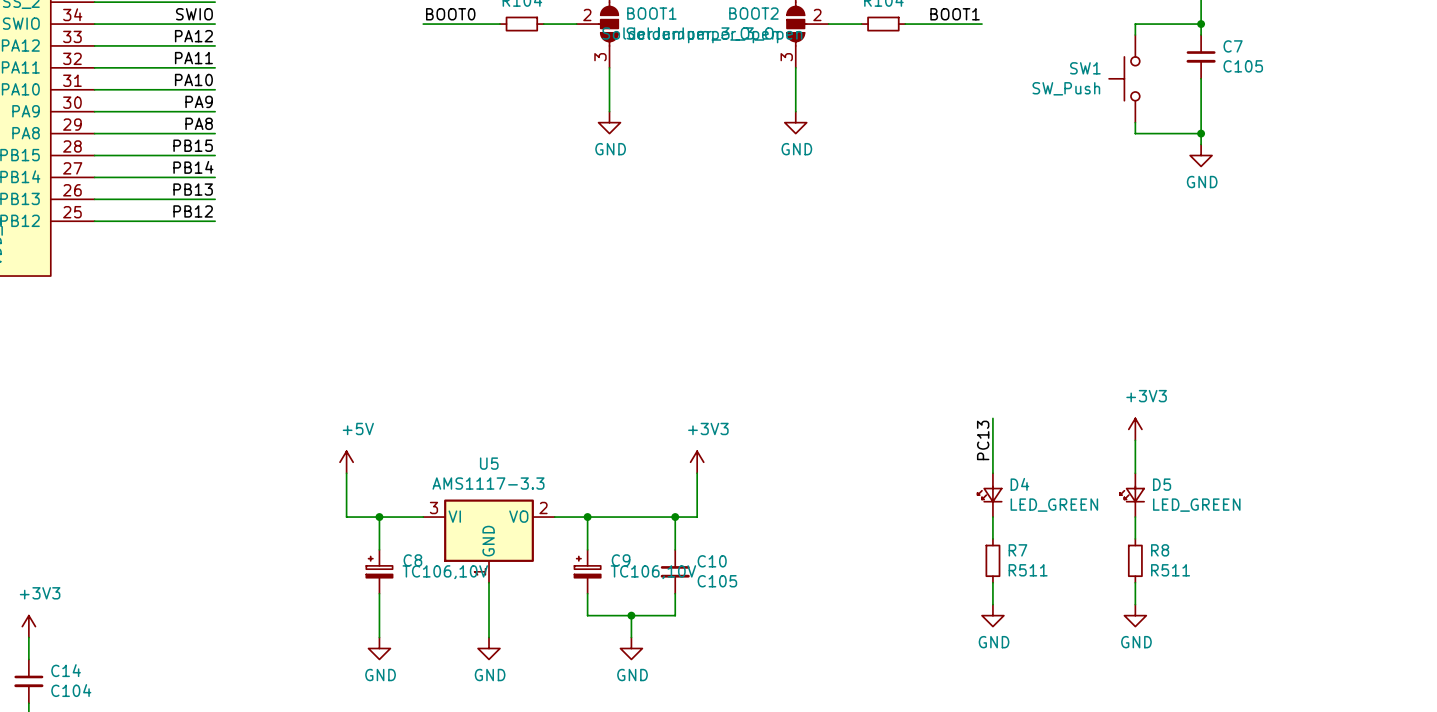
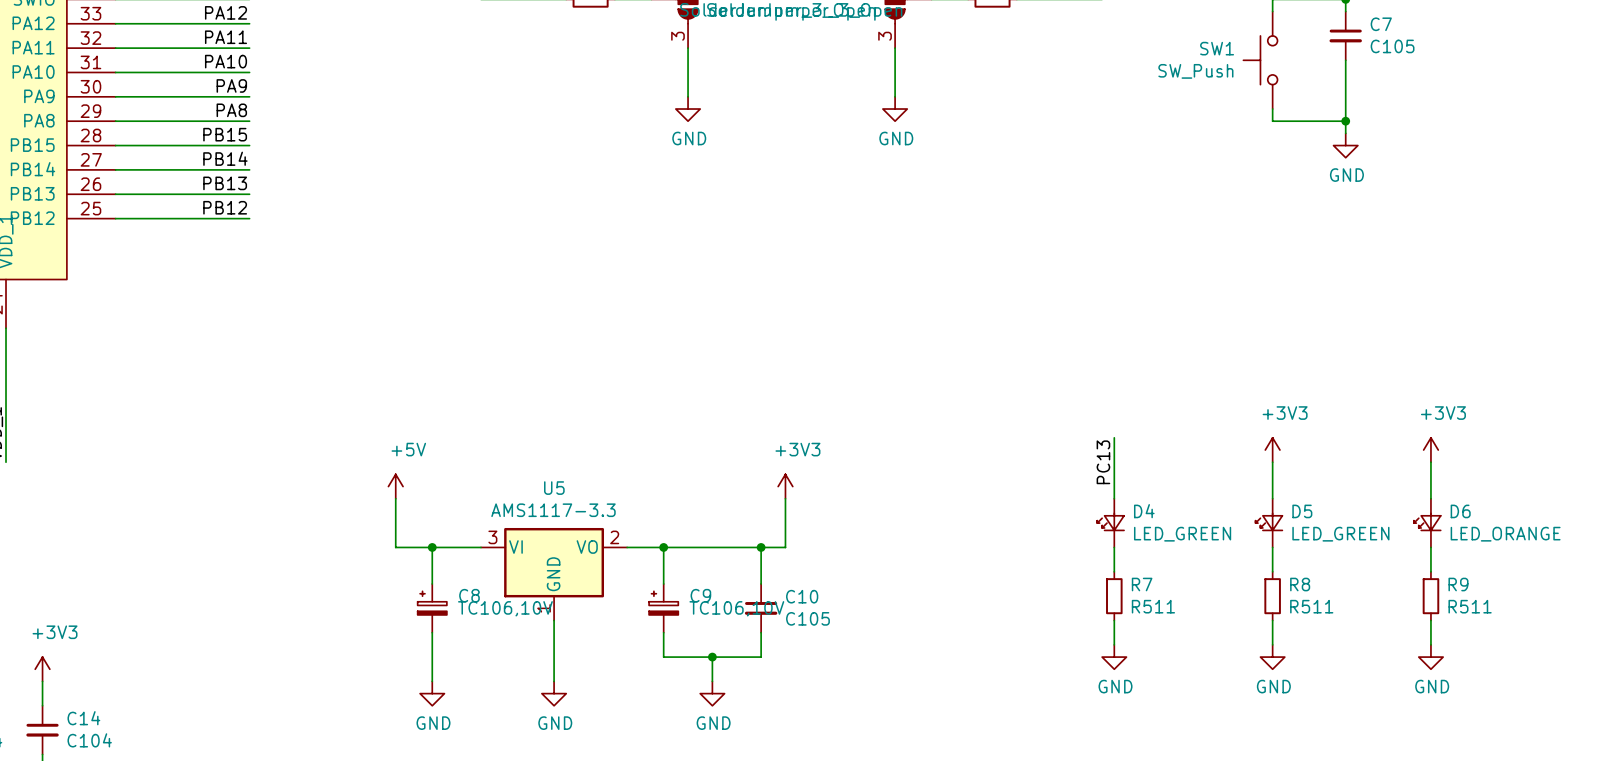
power symbol: none -> +3V3 (1430, 450)
wire: none -> (1430, 462) (1430, 498)
D6: none -> LED_ORANGE (1427, 523)
wire: none -> (1430, 547) (1430, 571)
R9: none -> R511 (1430, 596)
wire: none -> (1430, 620) (1430, 644)
power symbol: none -> GND (1430, 657)

